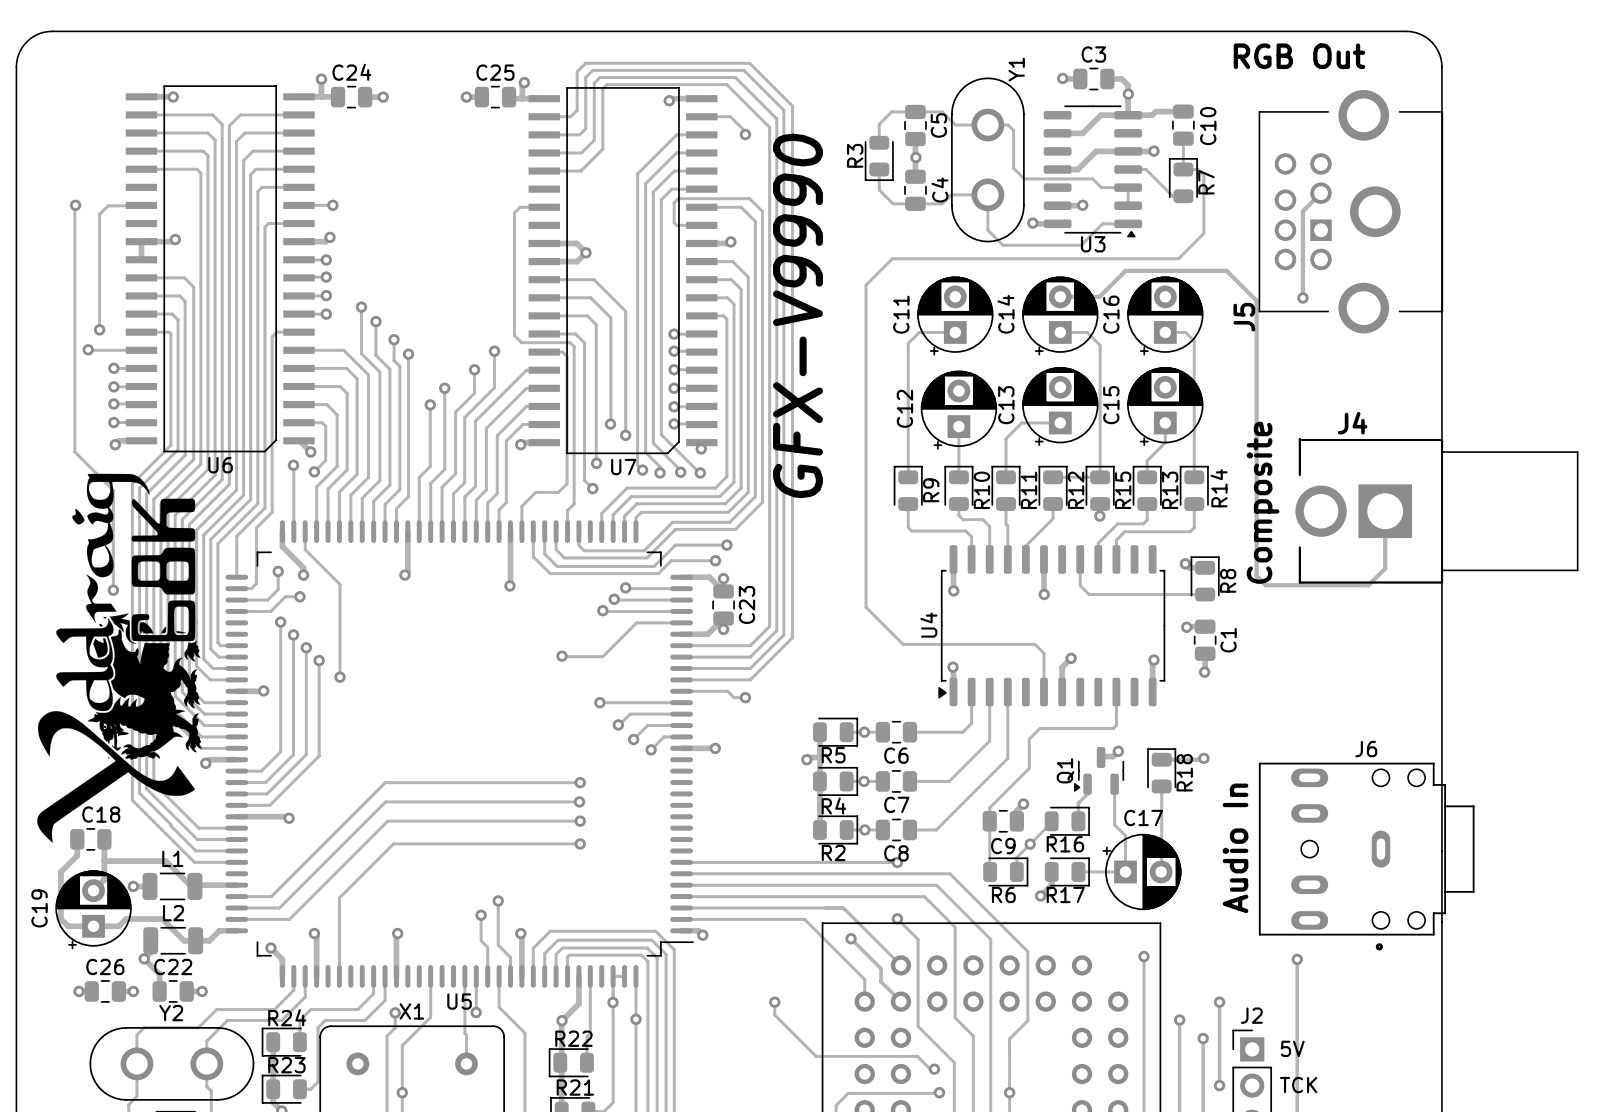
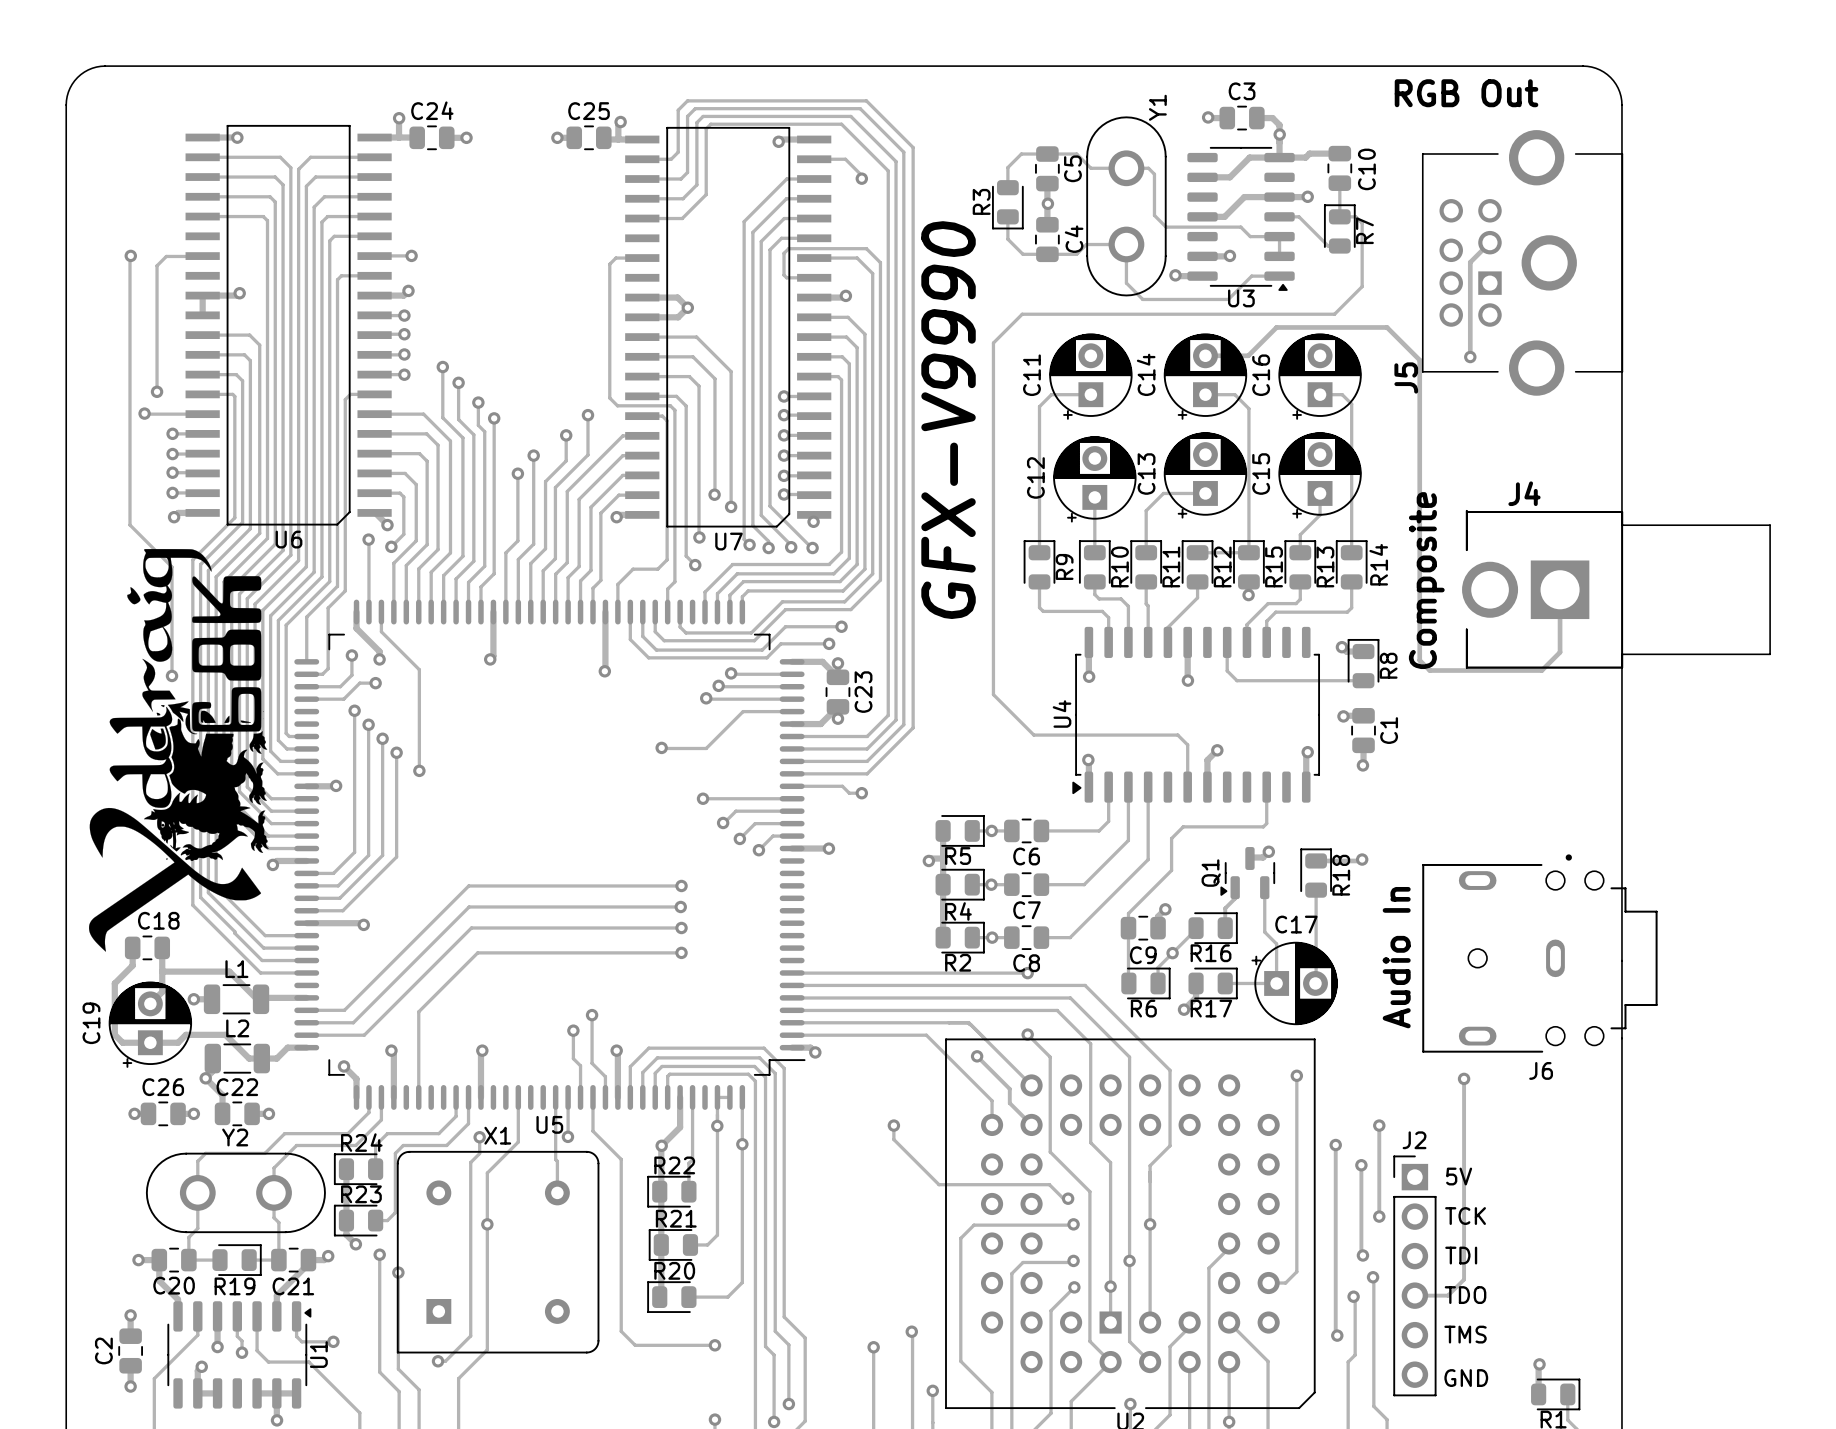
text position: GFX-V9990 (798, 315) -> GFX-V9990 (948, 420)
J6 name position: J6 (1366, 749) -> J6 (1541, 1070)
J6 footprint: [1258, 762, 1475, 951] -> [1422, 854, 1658, 1053]

